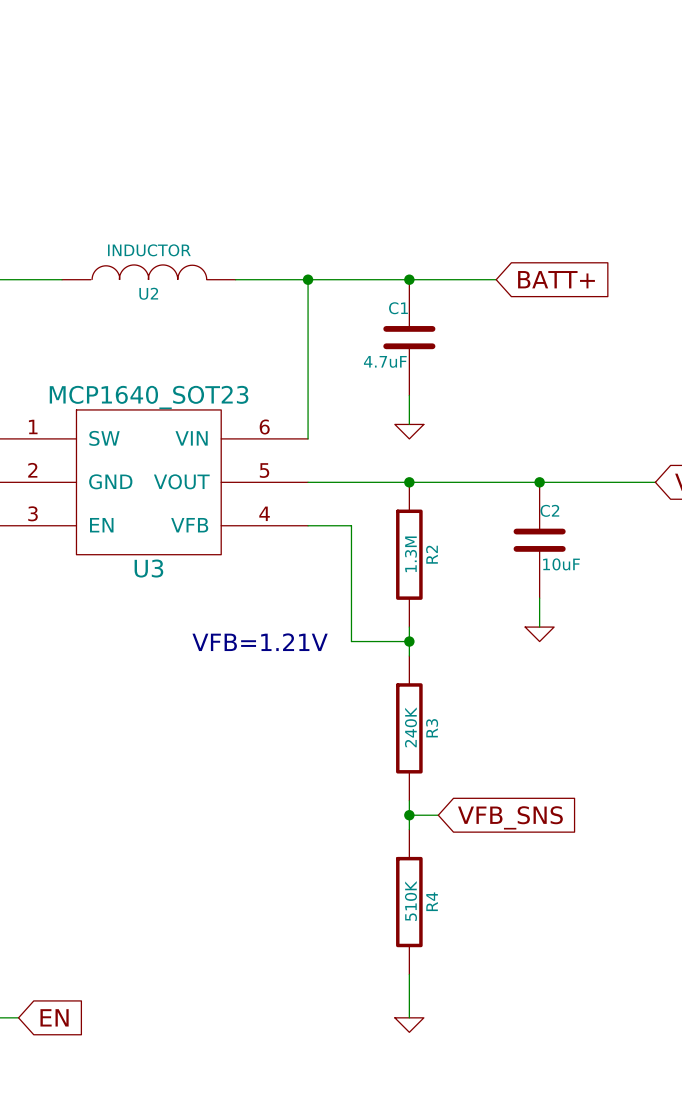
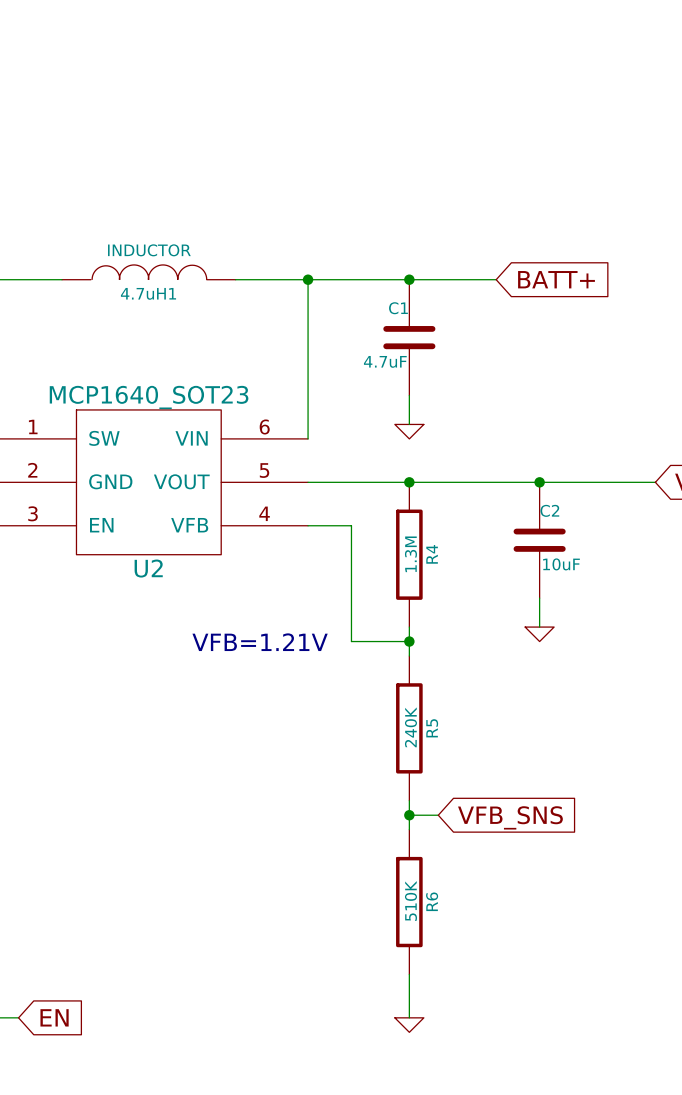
U2 name: U2 (148, 293) -> 4.7uH1 (148, 293)
R2 name: R2 (431, 554) -> R4 (432, 554)
U3 name: U3 (148, 568) -> U2 (148, 568)
R3 name: R3 (432, 728) -> R5 (432, 728)
R4 name: R4 (432, 901) -> R6 (432, 901)

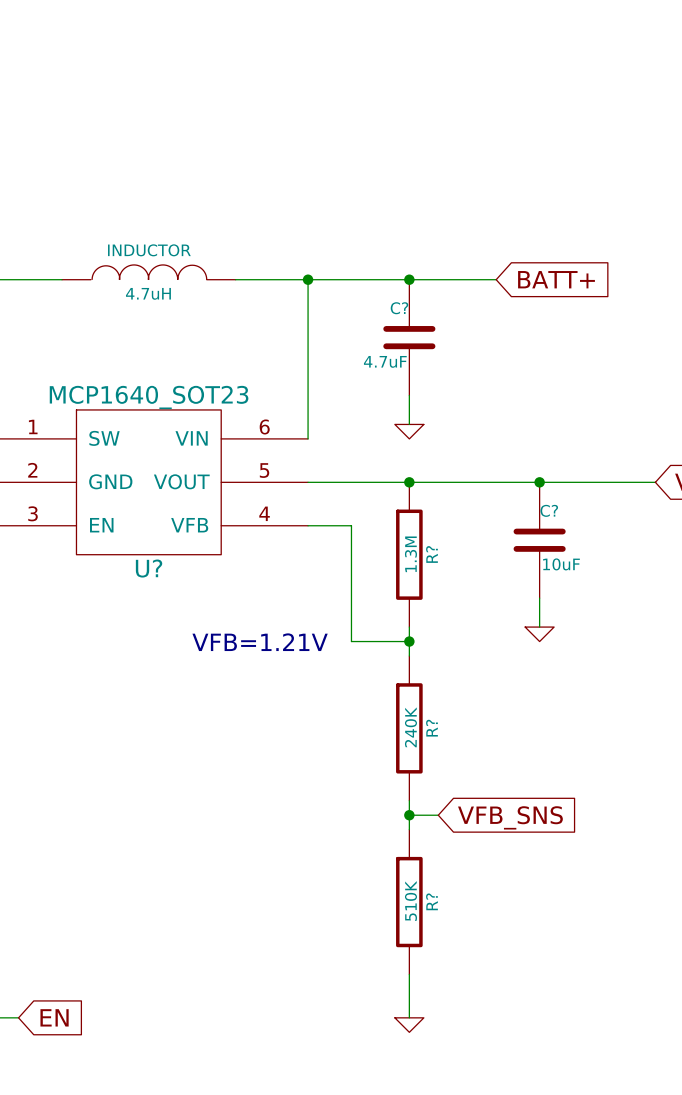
4.7uH1 name: 4.7uH1 (148, 293) -> 4.7uH (148, 293)
C1 name: C1 (398, 308) -> C? (399, 308)
C2 name: C2 (549, 510) -> C? (549, 510)
R4 name: R4 (432, 554) -> R? (431, 554)
U2 name: U2 (148, 568) -> U? (149, 568)
R5 name: R5 (432, 728) -> R? (431, 728)
R6 name: R6 (432, 901) -> R? (431, 901)

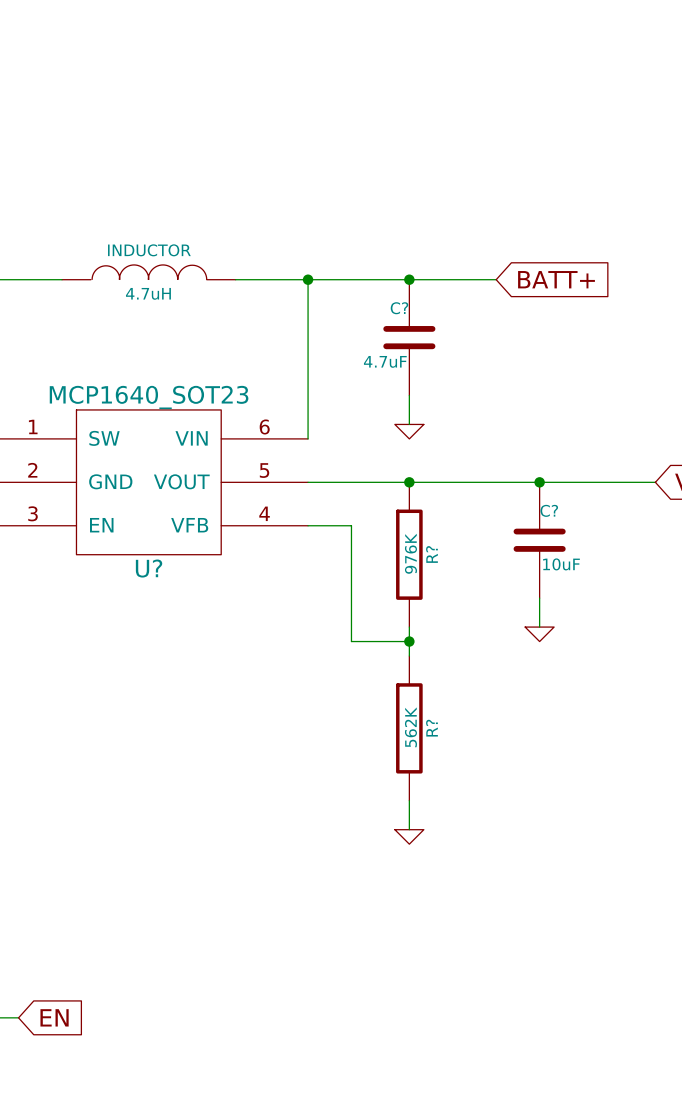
R? value: 1.3M (410, 554) -> 976K (410, 553)
text: VFB=1.21V (260, 642) -> none
R? value: 240K (410, 727) -> 562K (410, 727)
wire: (409, 815) (438, 815) -> none
junction: (409, 815) -> none
global label: VFB_SNS (510, 817) -> none
R?: 510K (409, 902) -> none
wire: (409, 974) (409, 1017) -> none
power symbol position: (409, 1025) -> (409, 836)

